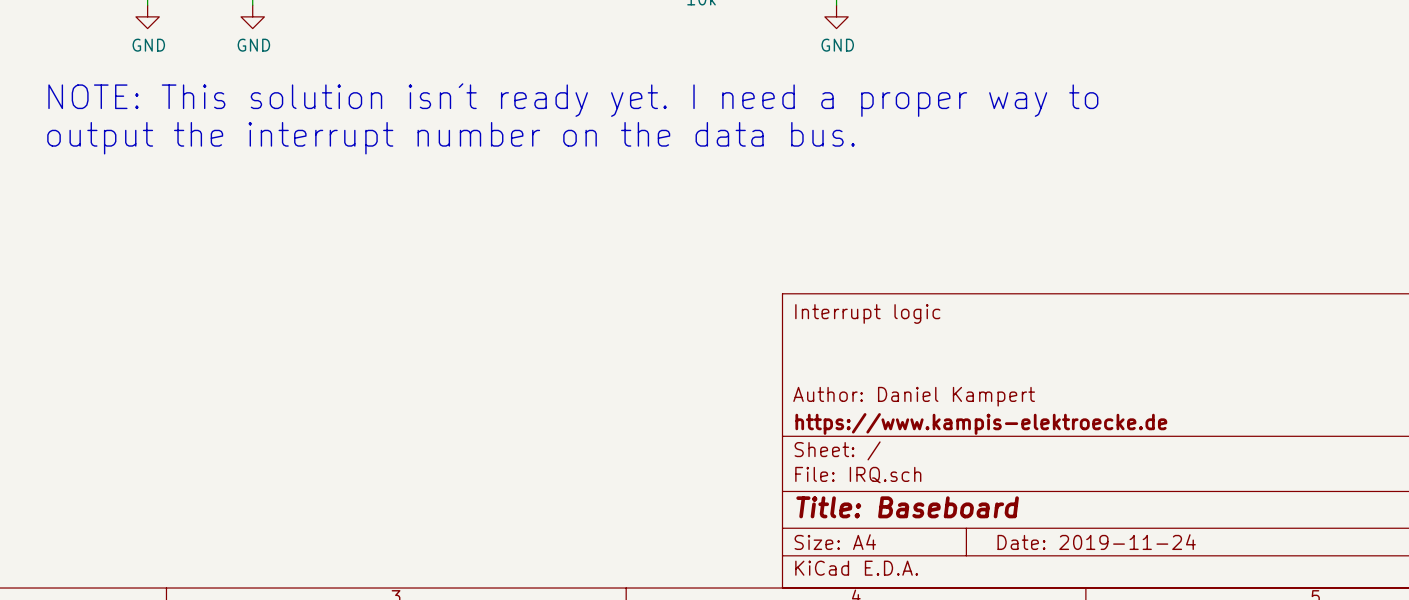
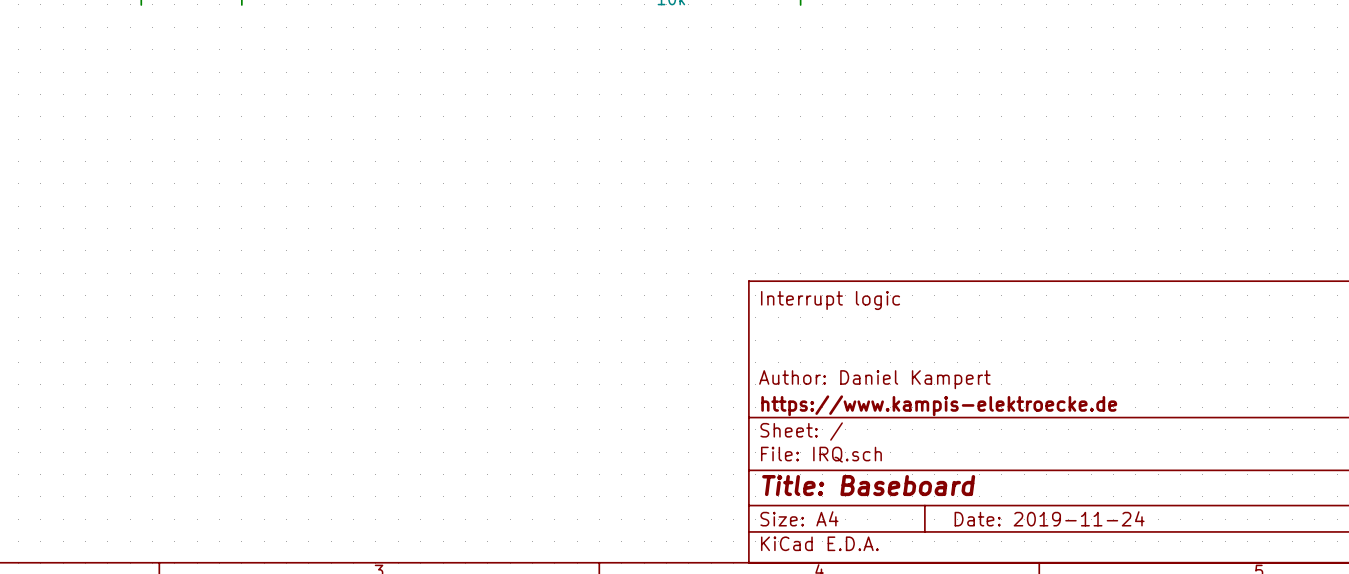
power symbol: GND (147, 16) -> none
power symbol: GND (252, 16) -> none
power symbol: GND (836, 16) -> none
text: NOTE: This solution isn´t ready yet. I need a proper way to (573, 100) -> none
text: output the interrupt number on the data bus. (451, 138) -> none

